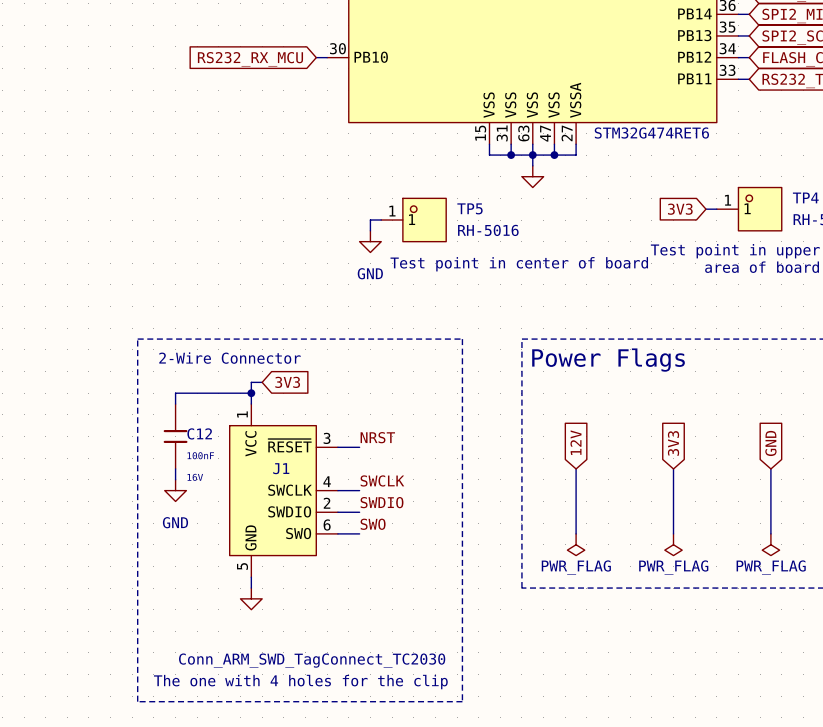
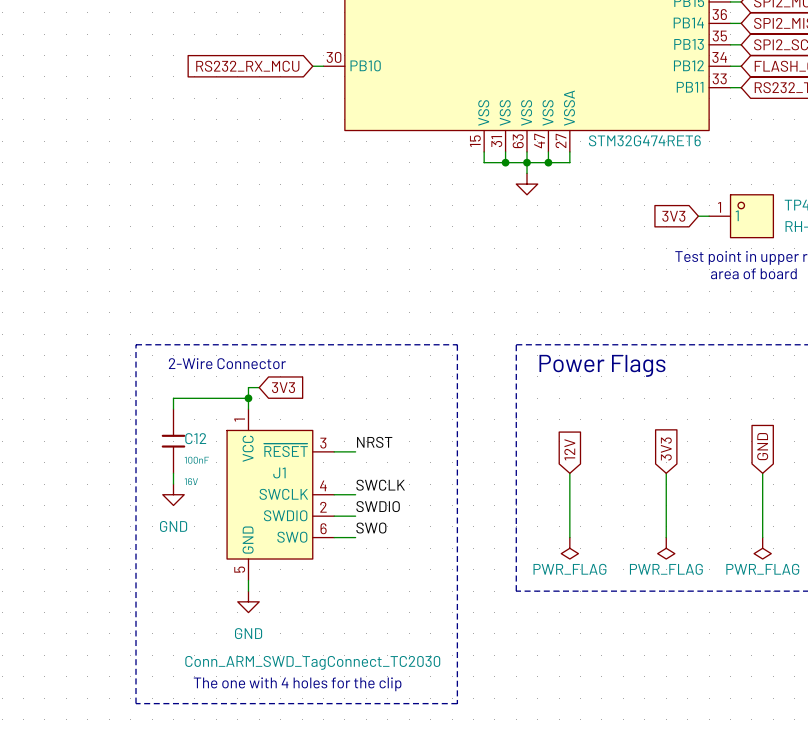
wire: (381, 220) (370, 220) (370, 230) -> none
TP5: RH-5016 (413, 220) -> none
power symbol: GND (370, 241) -> none
text: Test point in center of board (519, 264) -> none
power symbol text: none -> GND (248, 633)

